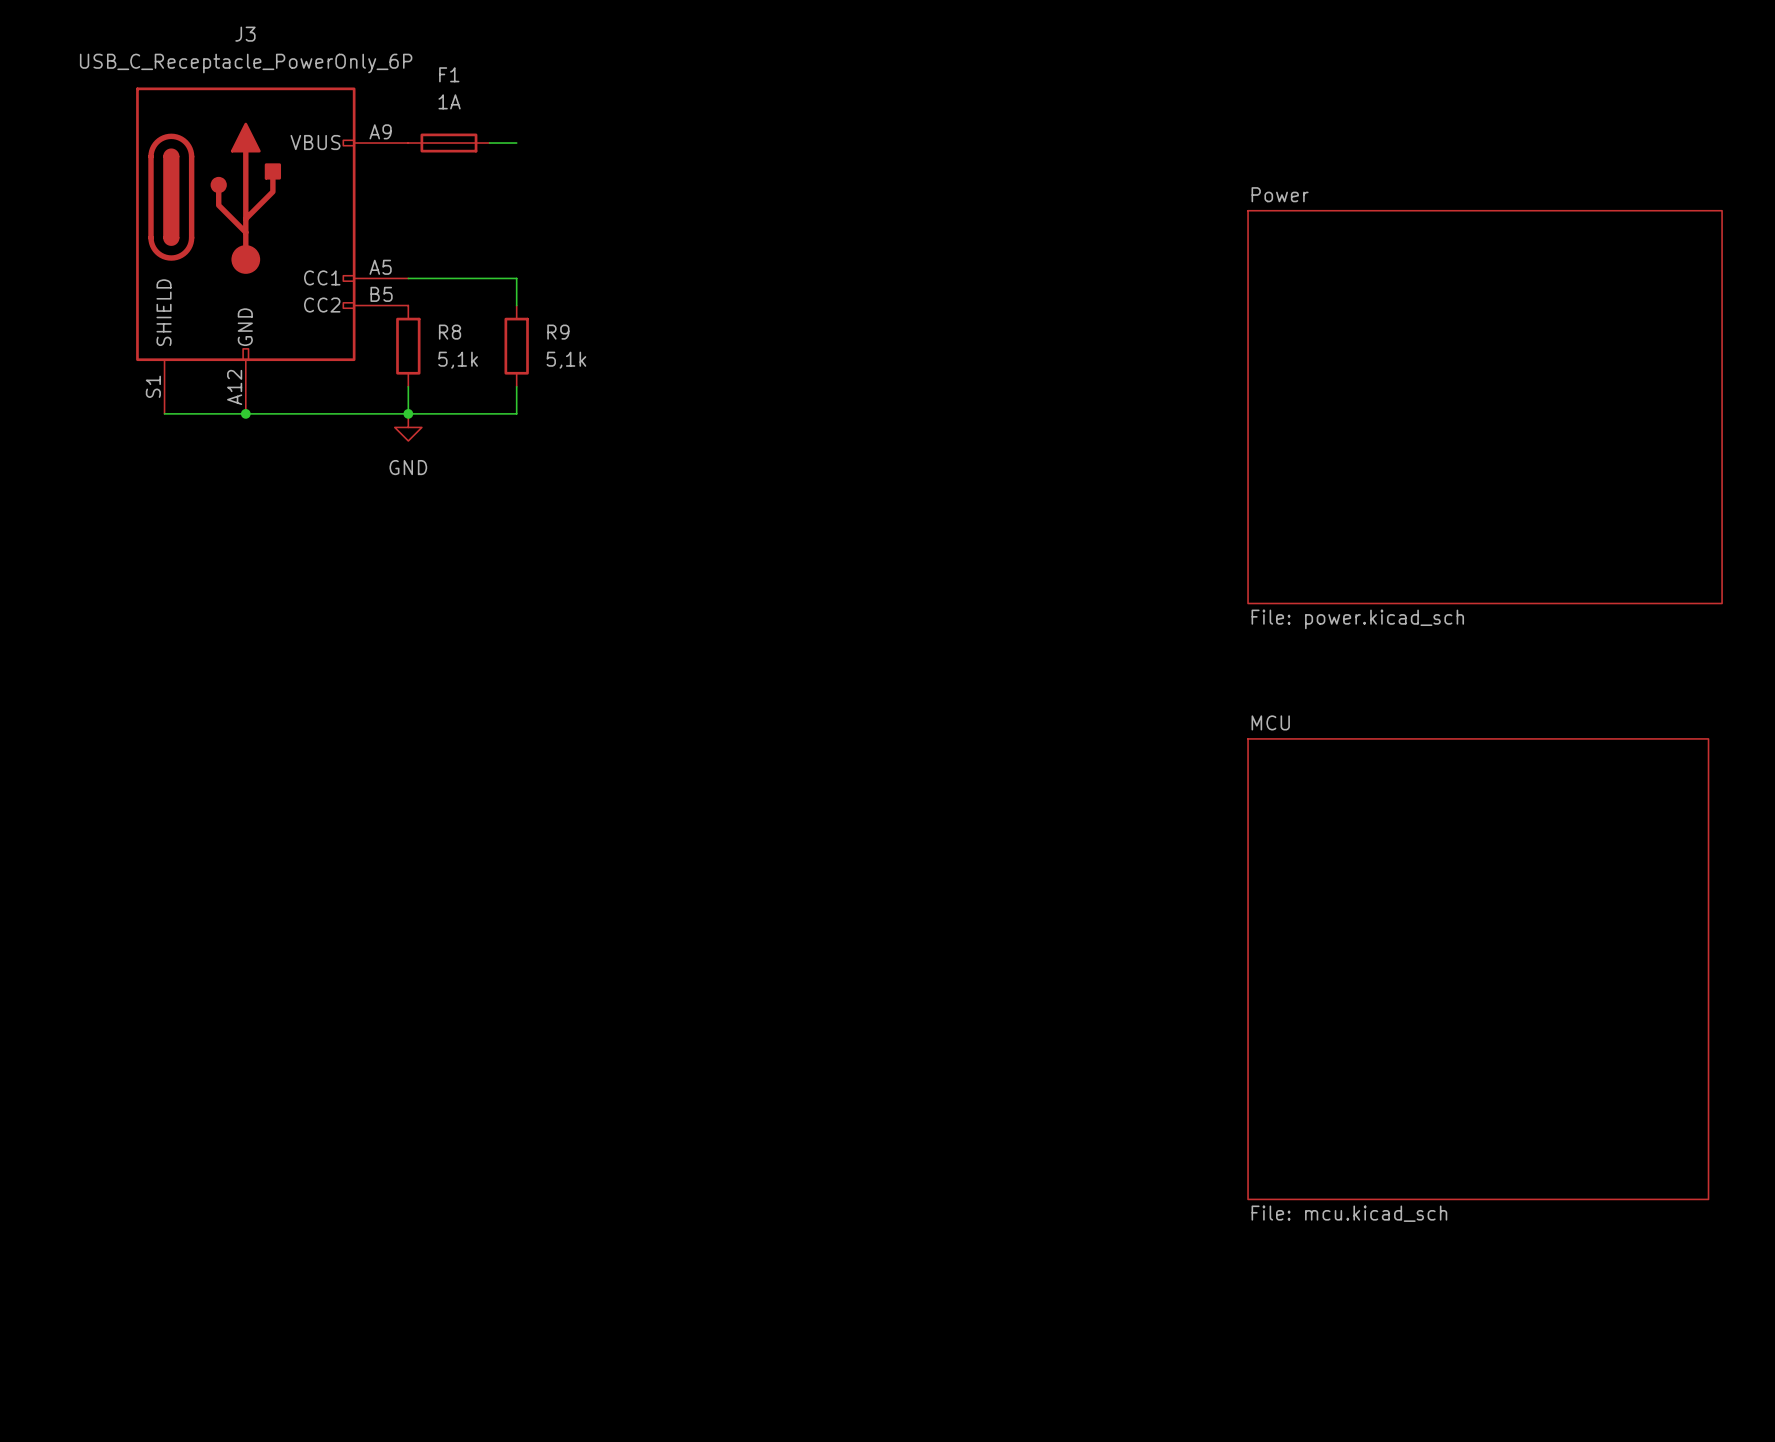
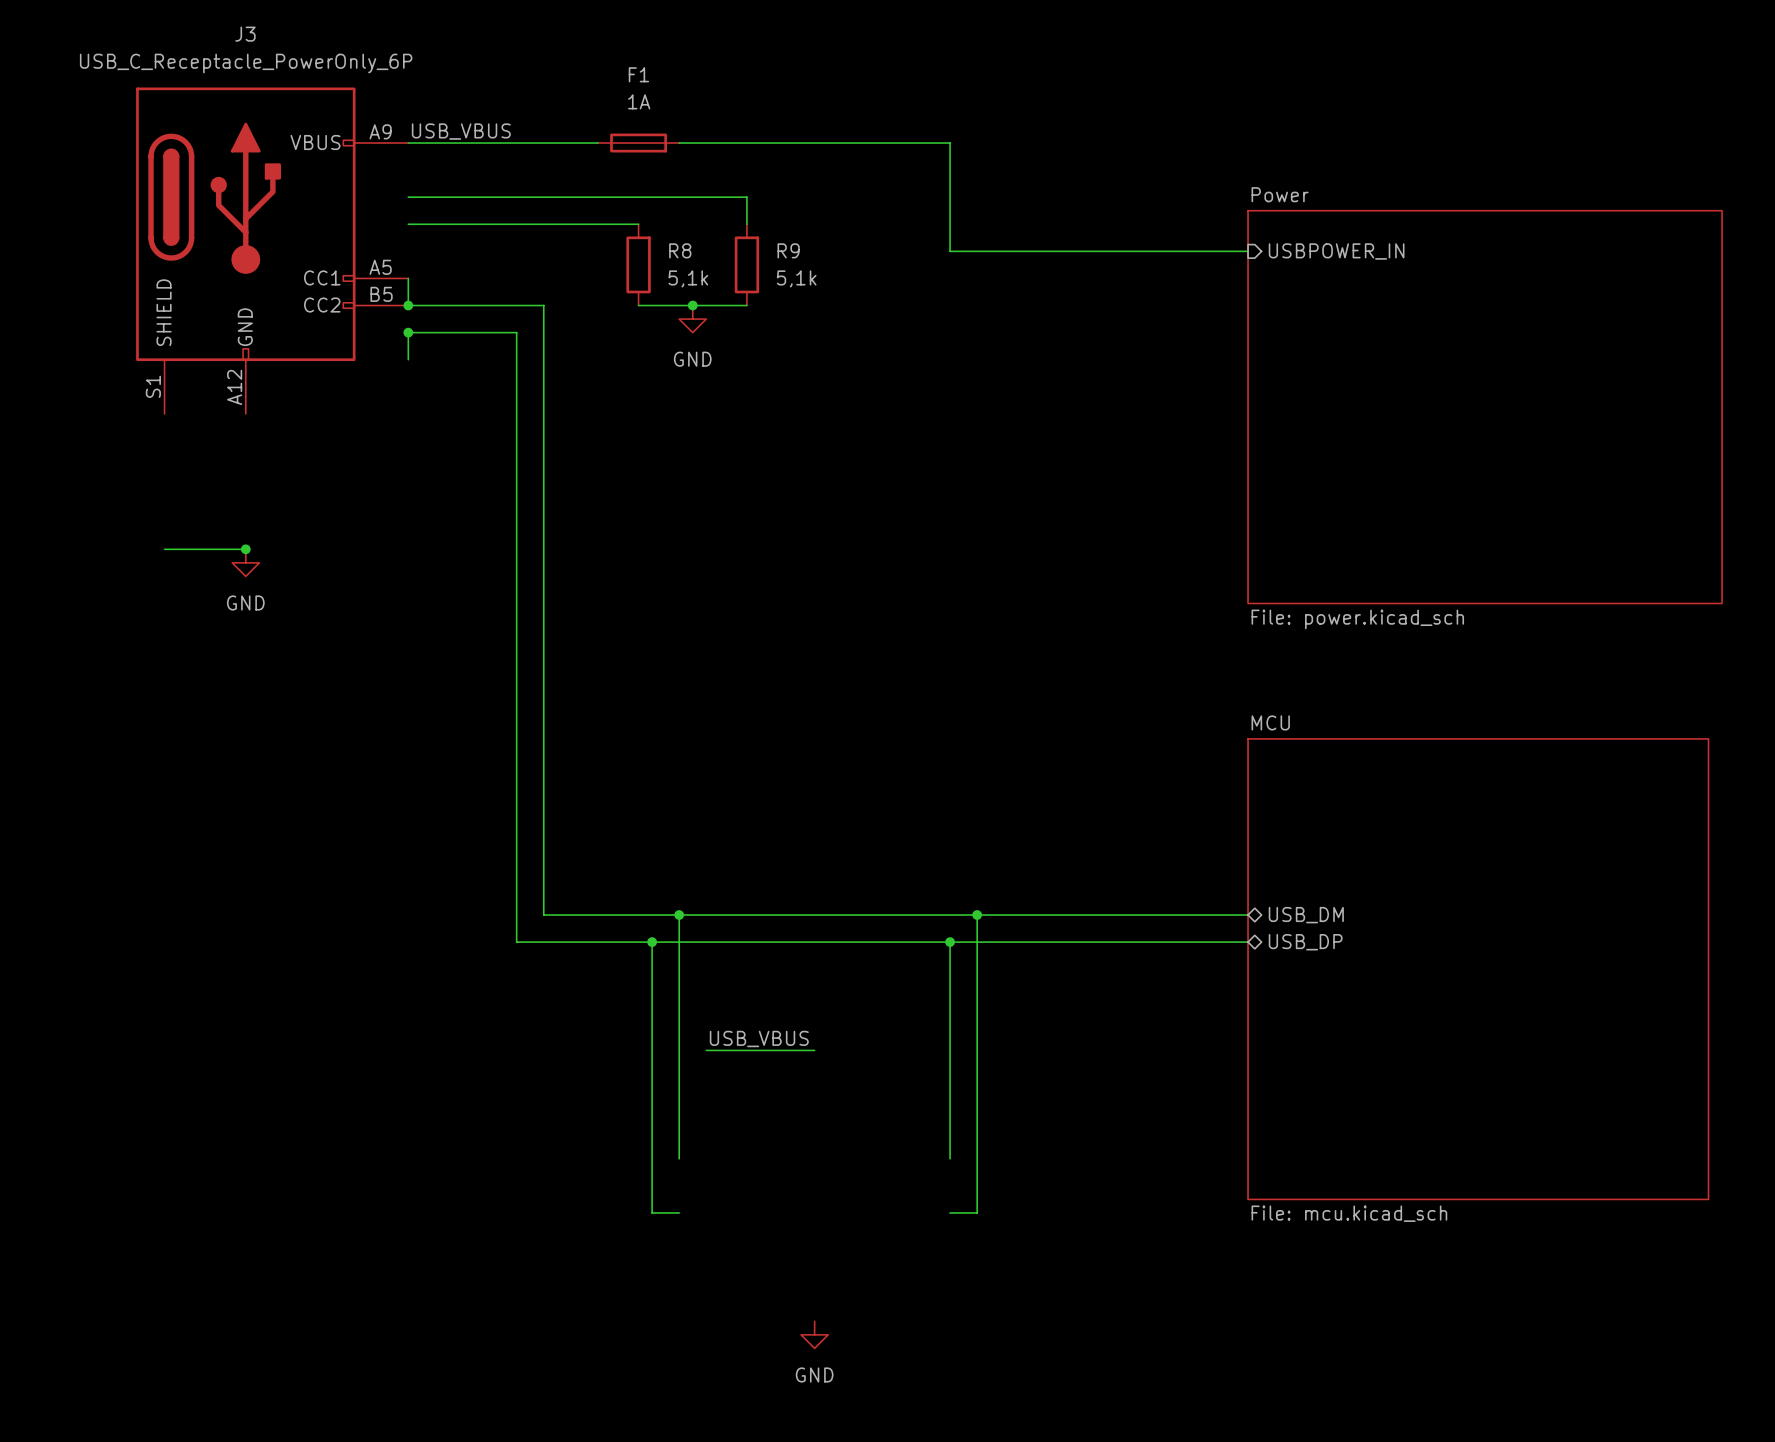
label: none -> USB_VBUS (461, 131)
F1 position: (448, 143) -> (638, 143)
wire: none -> (516, 143) (597, 143)
wire: none -> (679, 143) (950, 143) (950, 251) (1248, 251)
wire: none -> (408, 197) (746, 197) (746, 224)
wire: none -> (408, 224) (638, 224)
sheet pin: none -> USBPOWER_IN (1336, 251)
wire: (408, 278) (516, 278) (516, 305) -> (408, 278) (408, 305) (543, 305) (543, 915) (1248, 915)
junction: none -> (408, 305)
wire: none -> (638, 305) (746, 305)
junction: none -> (692, 305)
power symbol: none -> GND (692, 319)
junction: none -> (408, 332)
R8 position: (408, 346) -> (638, 264)
R9 position: (516, 346) -> (746, 264)
wire: none -> (408, 359) (408, 332) (516, 332) (516, 386)
wire: (408, 386) (408, 413) -> none
wire: (164, 413) (516, 413) -> (1248, 942) (516, 942) (516, 413)
junction: (245, 413) -> none
junction: (408, 413) -> none
power symbol: GND (408, 427) -> none
wire: none -> (164, 549) (245, 549)
junction: none -> (245, 549)
power symbol: none -> GND (245, 562)
wire: none -> (679, 915) (679, 1158)
junction: none -> (679, 915)
wire: none -> (977, 915) (977, 1212) (950, 1212)
junction: none -> (977, 915)
sheet pin: none -> USB_DM (1306, 915)
wire: none -> (652, 942) (652, 1212) (679, 1212)
junction: none -> (652, 942)
wire: none -> (950, 942) (950, 1158)
junction: none -> (950, 942)
sheet pin: none -> USB_DP (1305, 942)
label: none -> USB_VBUS (759, 1038)
wire: none -> (706, 1050) (814, 1050)
power symbol: none -> GND (814, 1334)

